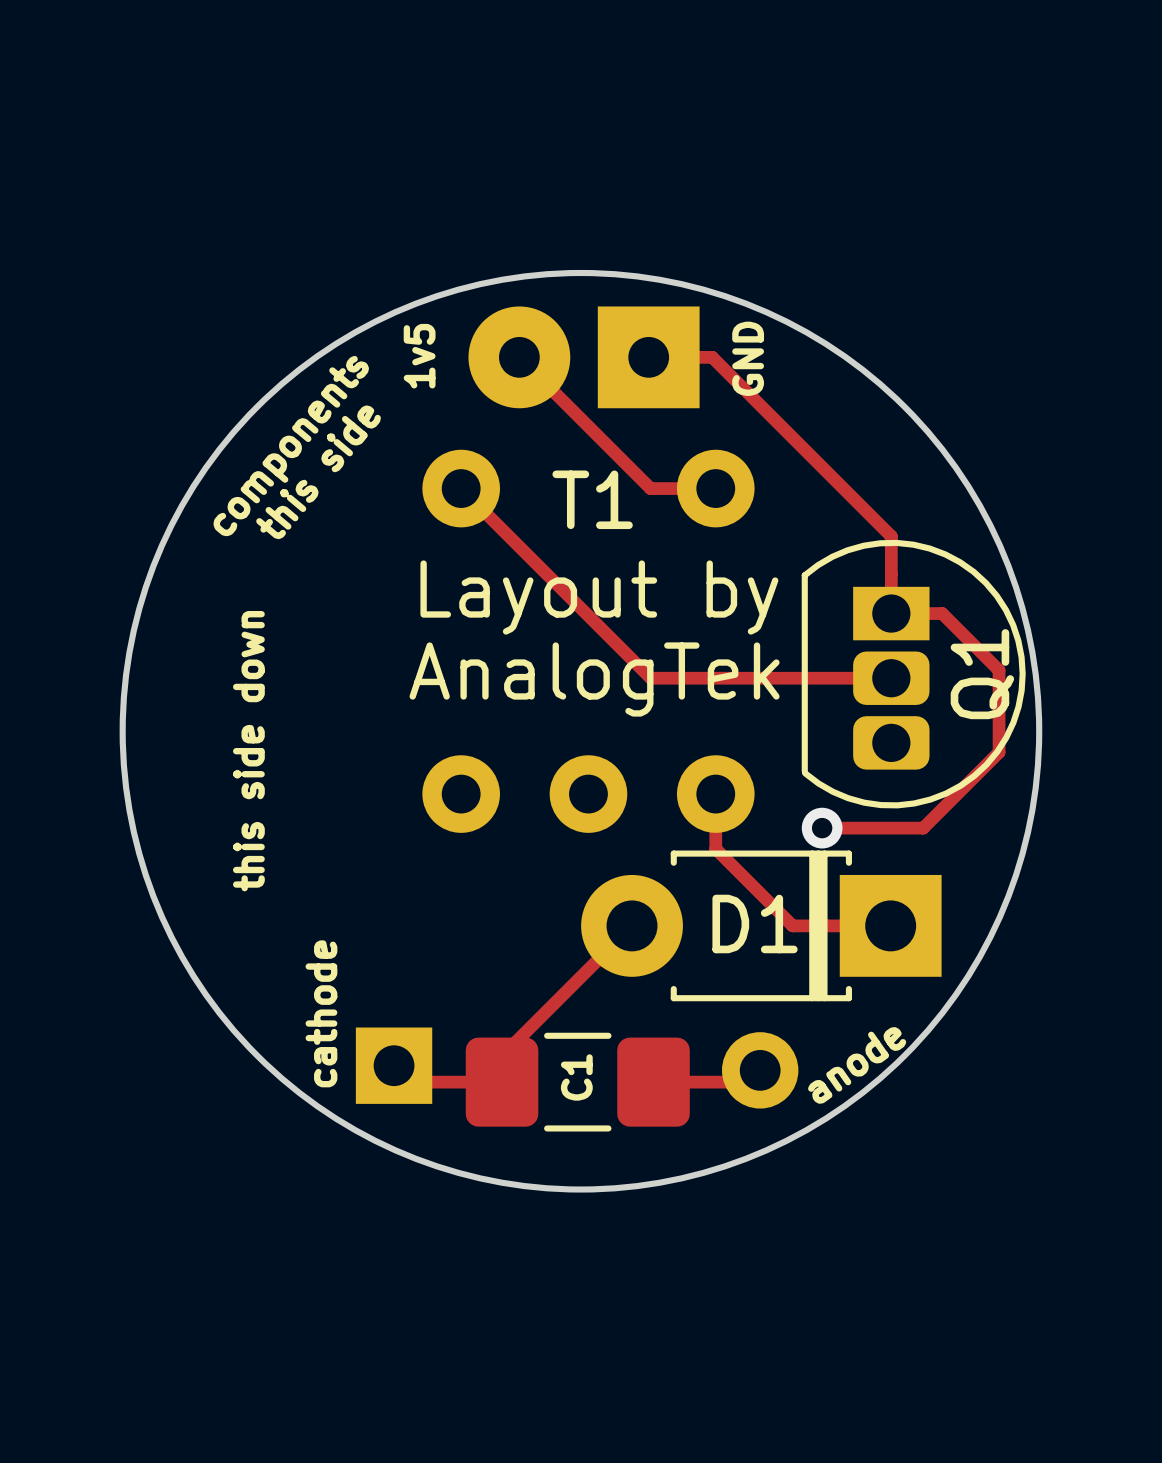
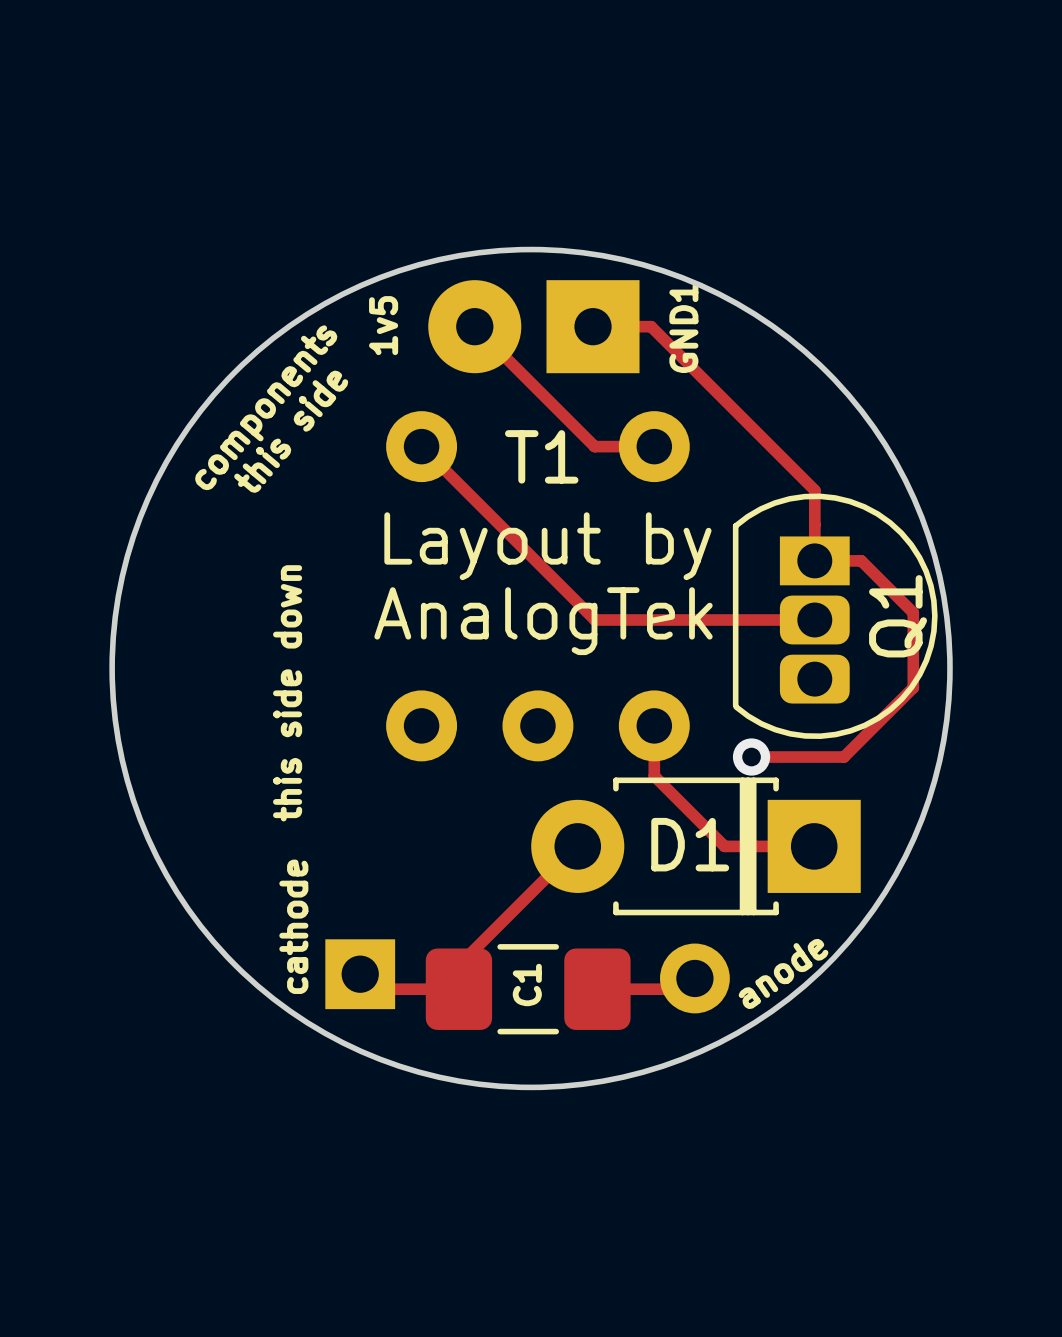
GND name: GND (748, 358) -> GND1 (683, 327)
text position: this side down (248, 751) -> this side down (287, 693)

